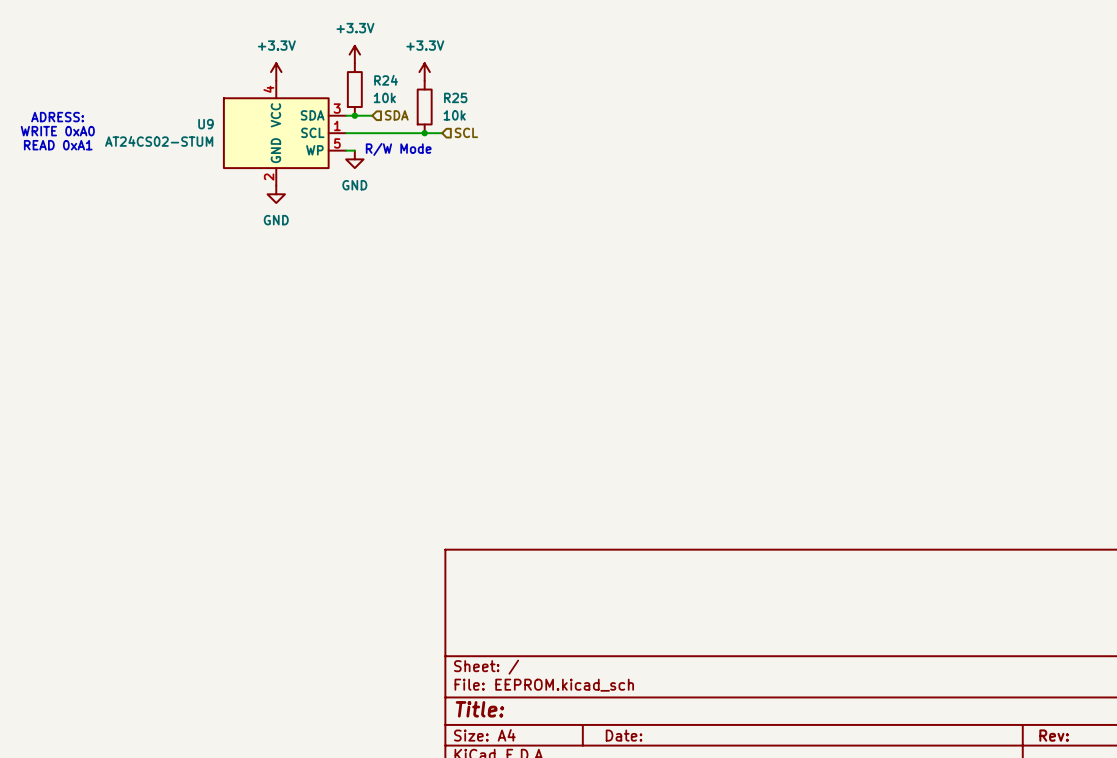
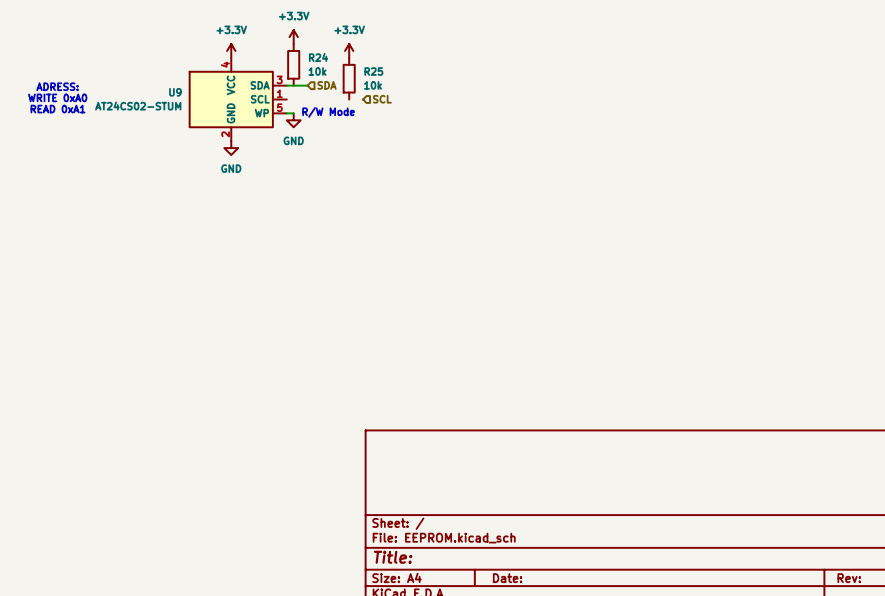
junction: (354, 115) -> none
wire: (346, 133) (442, 133) -> none
junction: (424, 133) -> none

